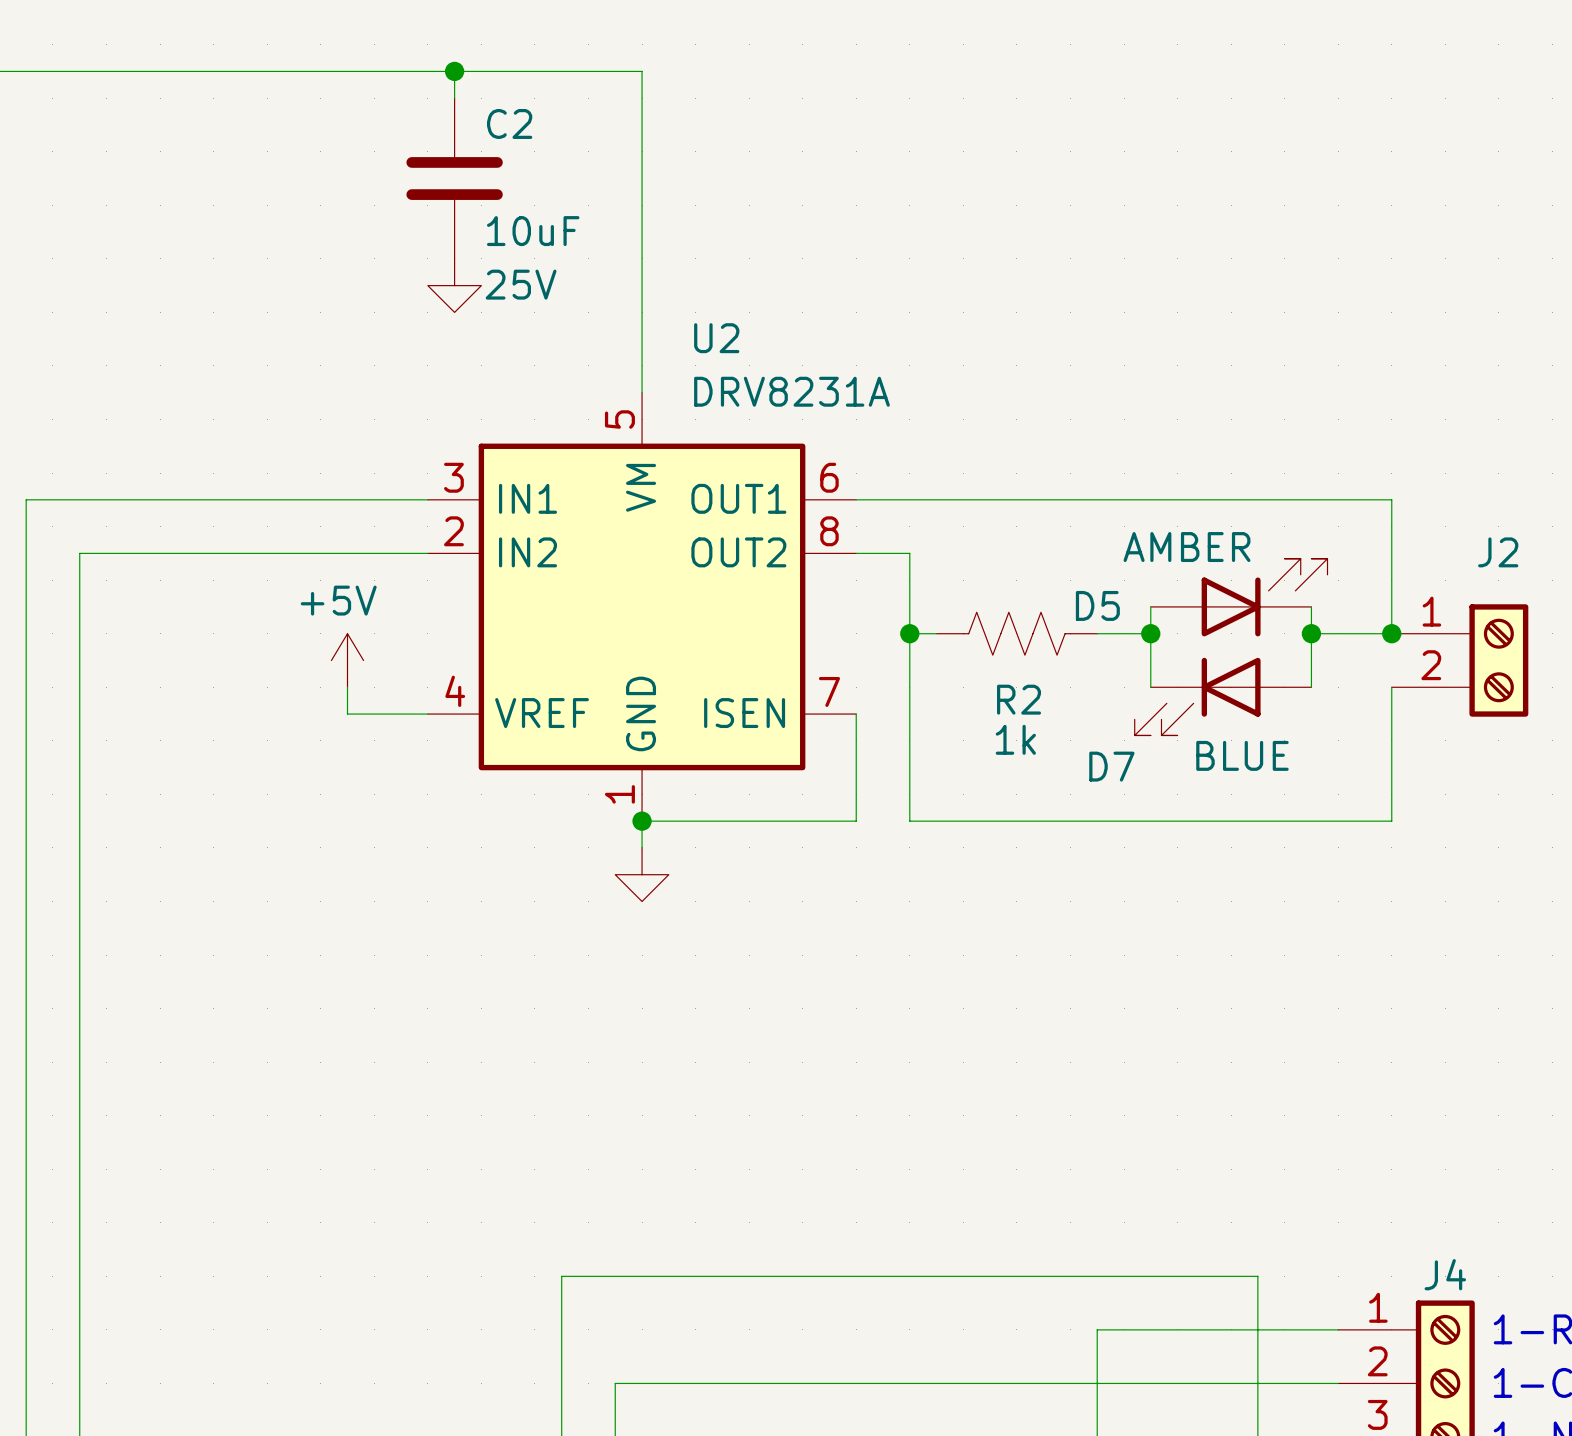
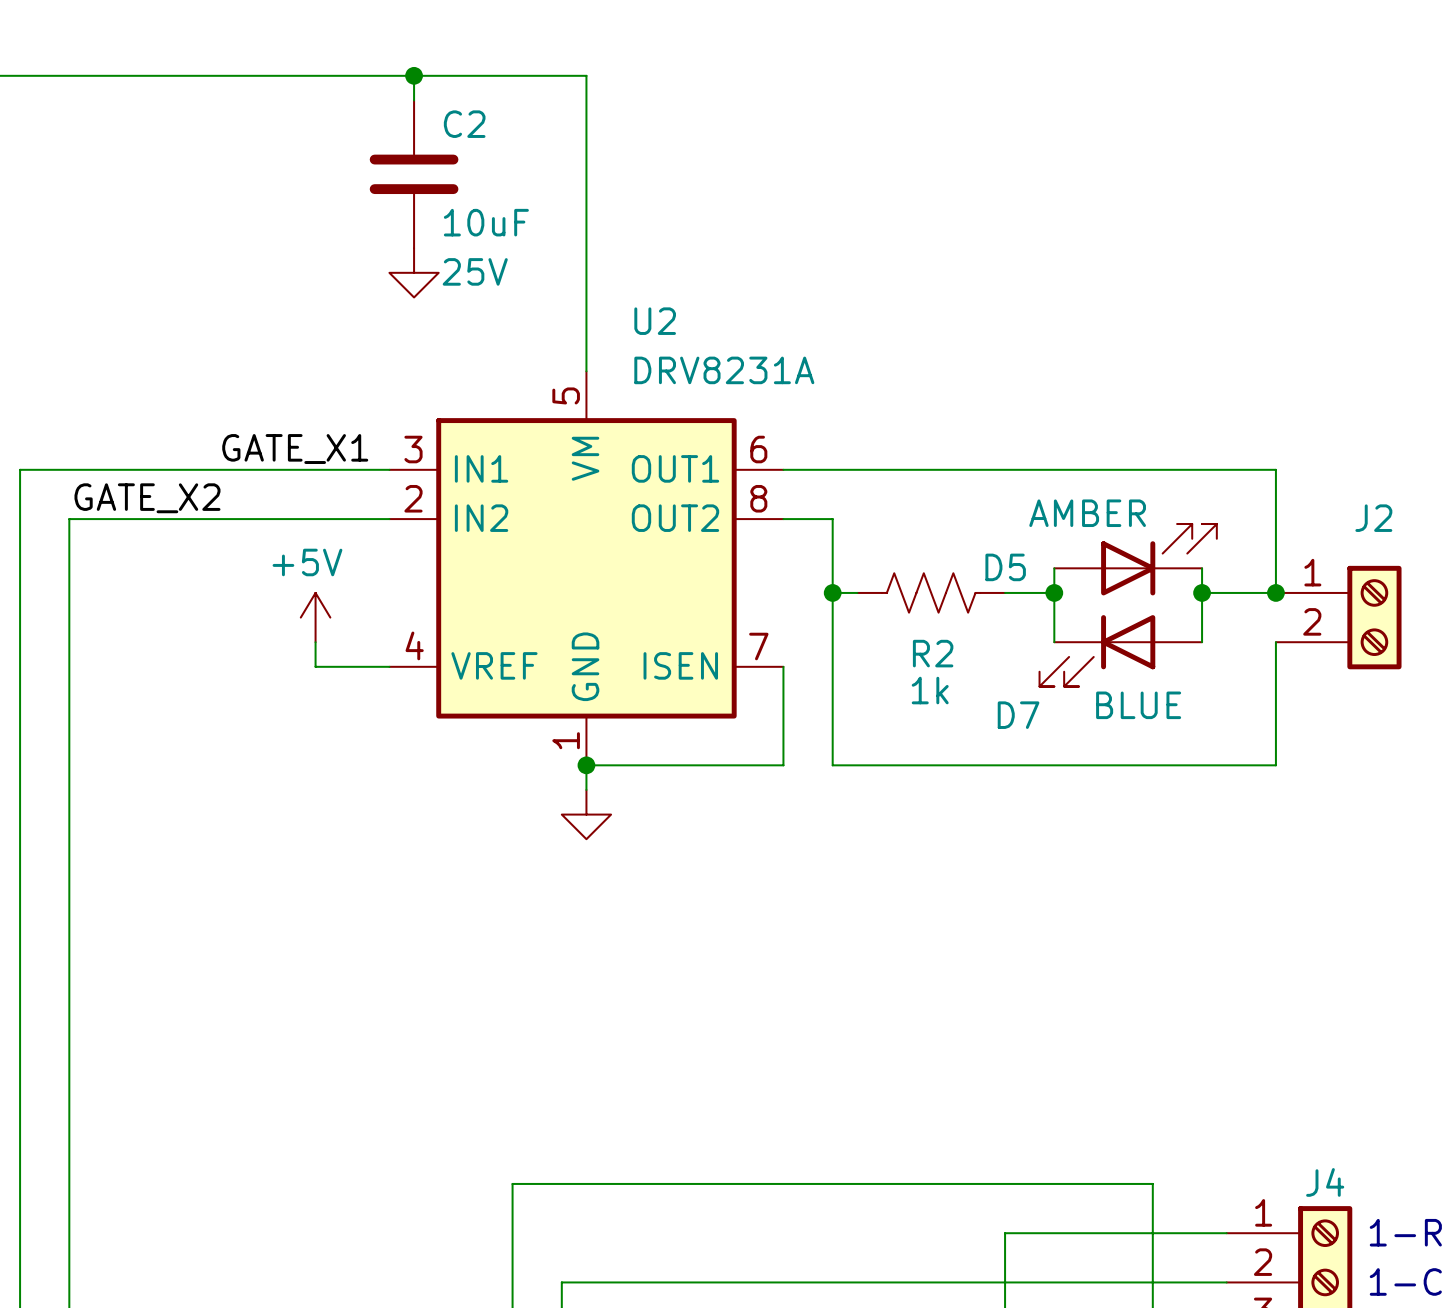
label: none -> GATE_X1 (295, 449)
label: none -> GATE_X2 (147, 498)

